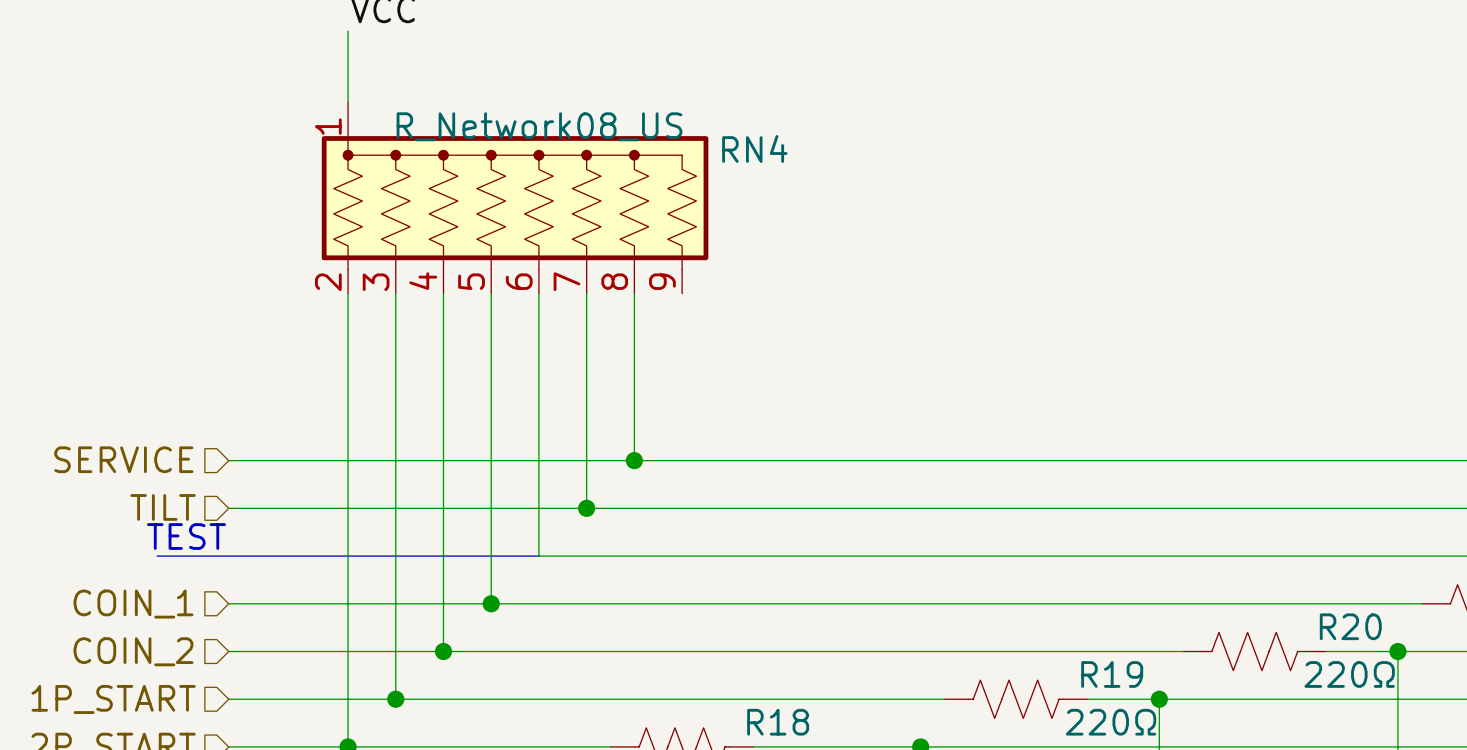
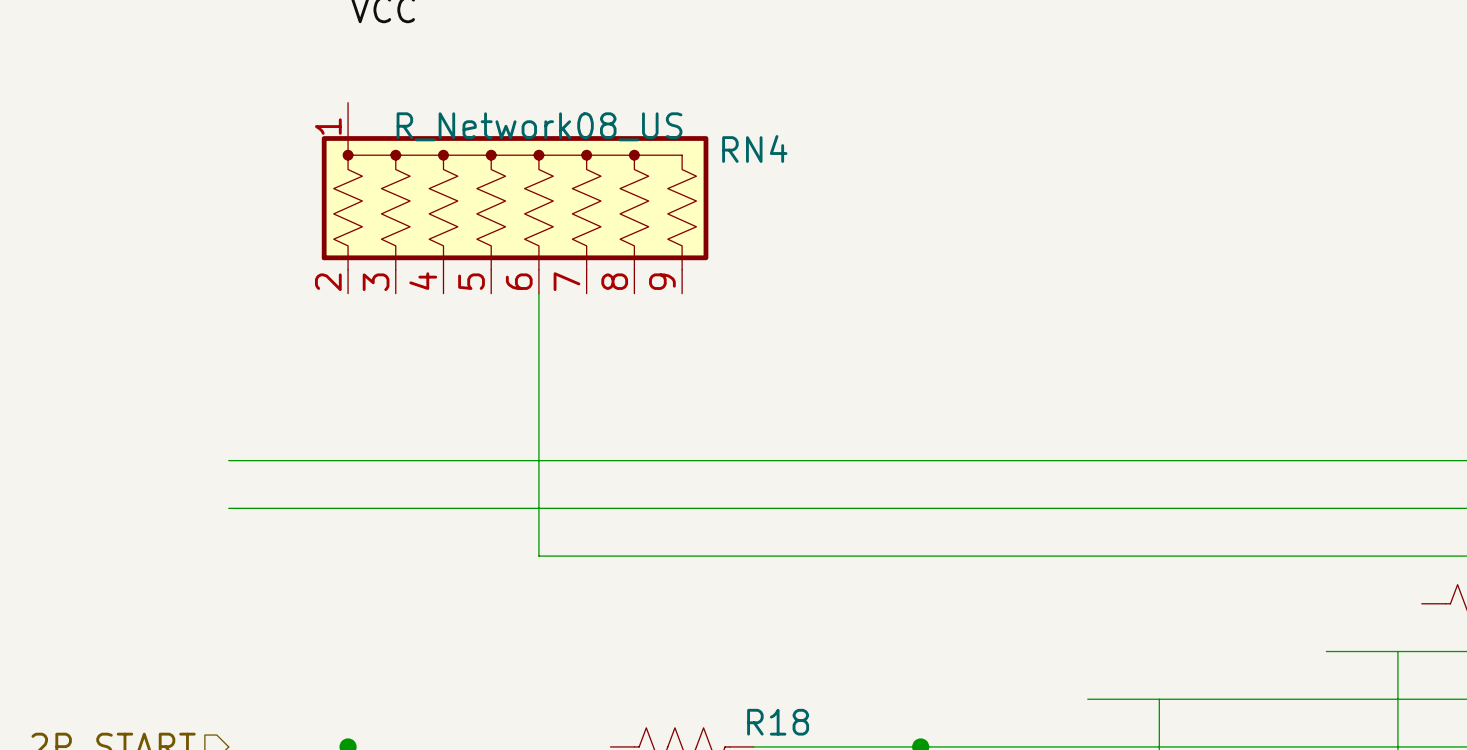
wire: (348, 31) (348, 102) -> none
wire: (348, 293) (348, 746) -> none
wire: (395, 293) (395, 699) -> none
wire: (443, 293) (443, 651) -> none
wire: (491, 293) (491, 603) -> none
wire: (586, 293) (586, 508) -> none
wire: (634, 293) (634, 460) -> none
hierarchical label: SERVICE (123, 459) -> none
junction: (634, 460) -> none
hierarchical label: TILT (163, 507) -> none
junction: (586, 508) -> none
text: TEST (186, 536) -> none
line: (157, 556) (538, 556) -> none
wire: (228, 603) (1421, 603) -> none
junction: (491, 603) -> none
hierarchical label: COIN_1 (133, 604) -> none
hierarchical label: COIN_2 (133, 651) -> none
wire: (228, 651) (1183, 651) -> none
junction: (443, 651) -> none
R20: 220Ω (1254, 651) -> none
junction: (1397, 651) -> none
hierarchical label: 1P_START (113, 699) -> none
wire: (228, 699) (944, 699) -> none
junction: (395, 699) -> none
R19: 220Ω (1016, 699) -> none
junction: (1159, 699) -> none
wire: (228, 746) (610, 746) -> none

